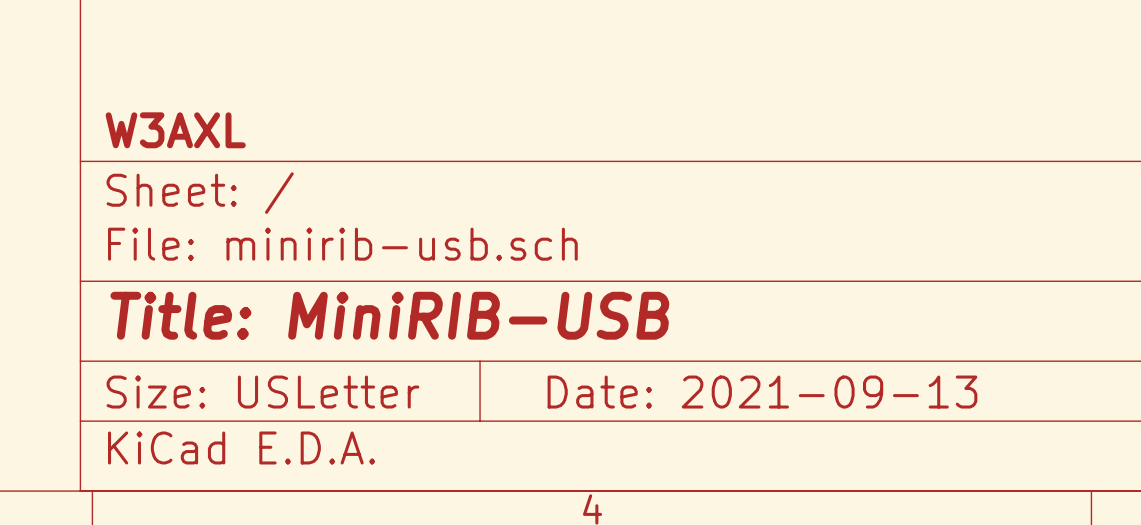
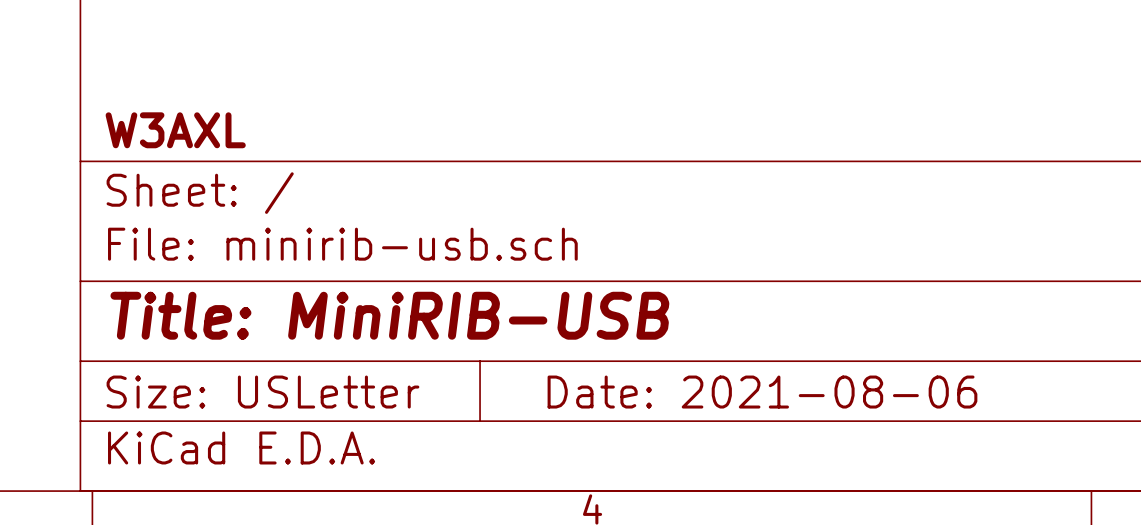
title block: Date: 2021-09-13 (762, 392) -> Date: 2021-08-06 (762, 392)

